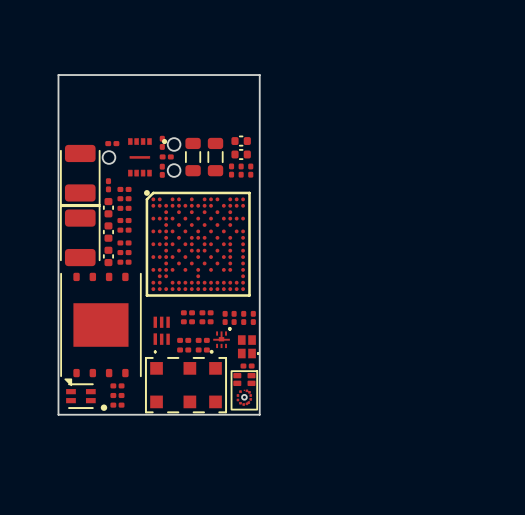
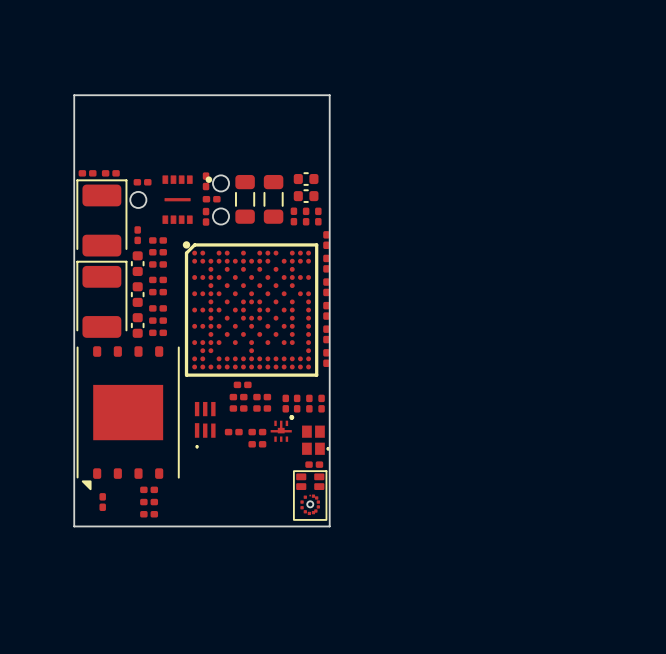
part: none -> (87, 173)
part: none -> (110, 173)
part rotation: 0° (80, 175) -> 180° (101, 217)
part: none -> (326, 240)
part: none -> (326, 263)
part: none -> (326, 287)
part: none -> (326, 310)
part: none -> (326, 334)
part: none -> (326, 358)
part position: (184, 349) -> (242, 384)
part: (186, 381) -> none
part footprint: [66, 383, 108, 411] -> [99, 493, 106, 512]

